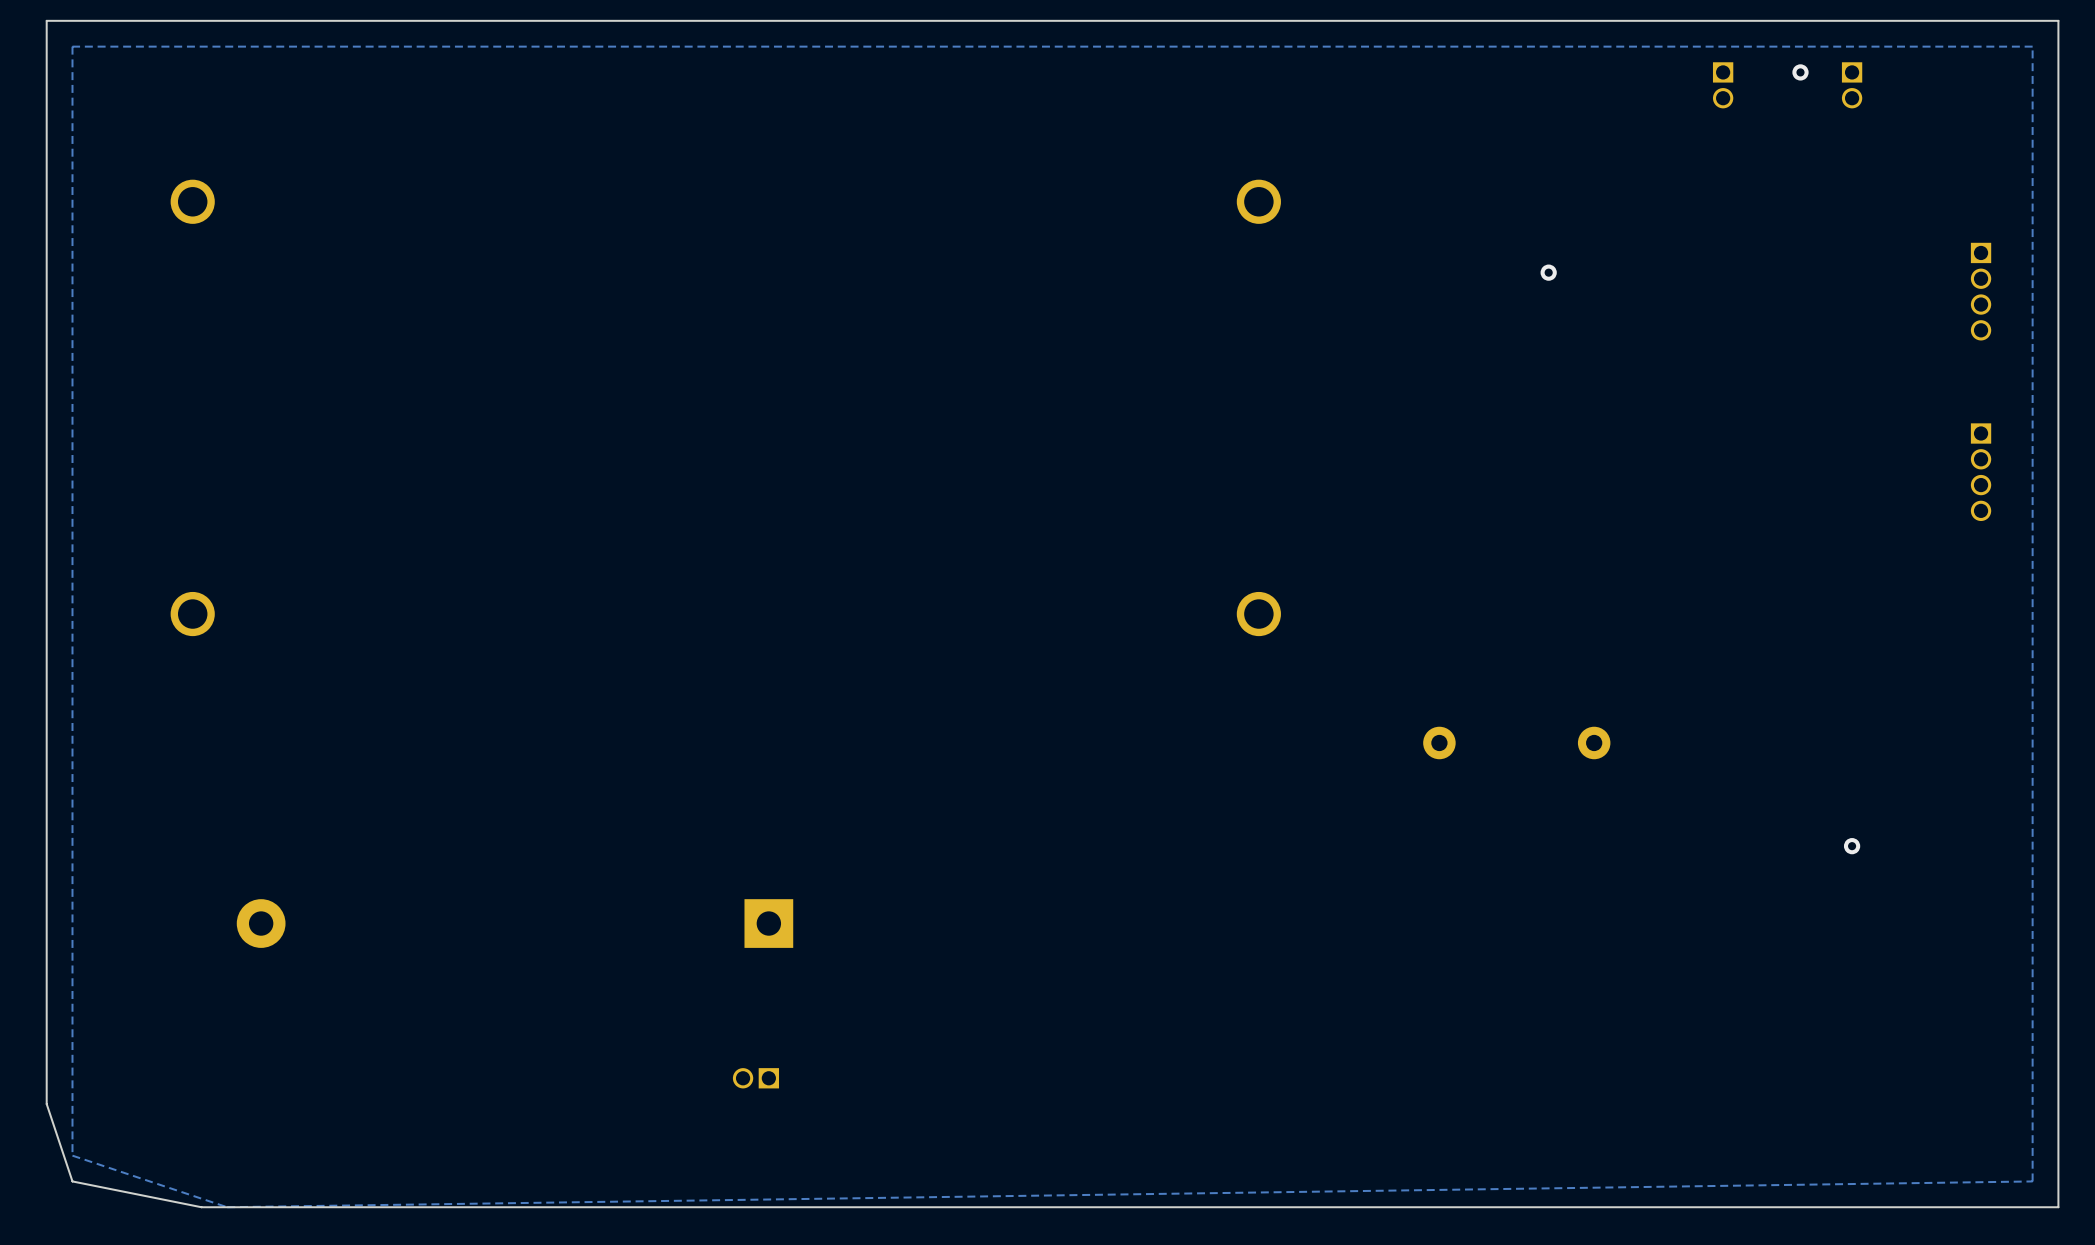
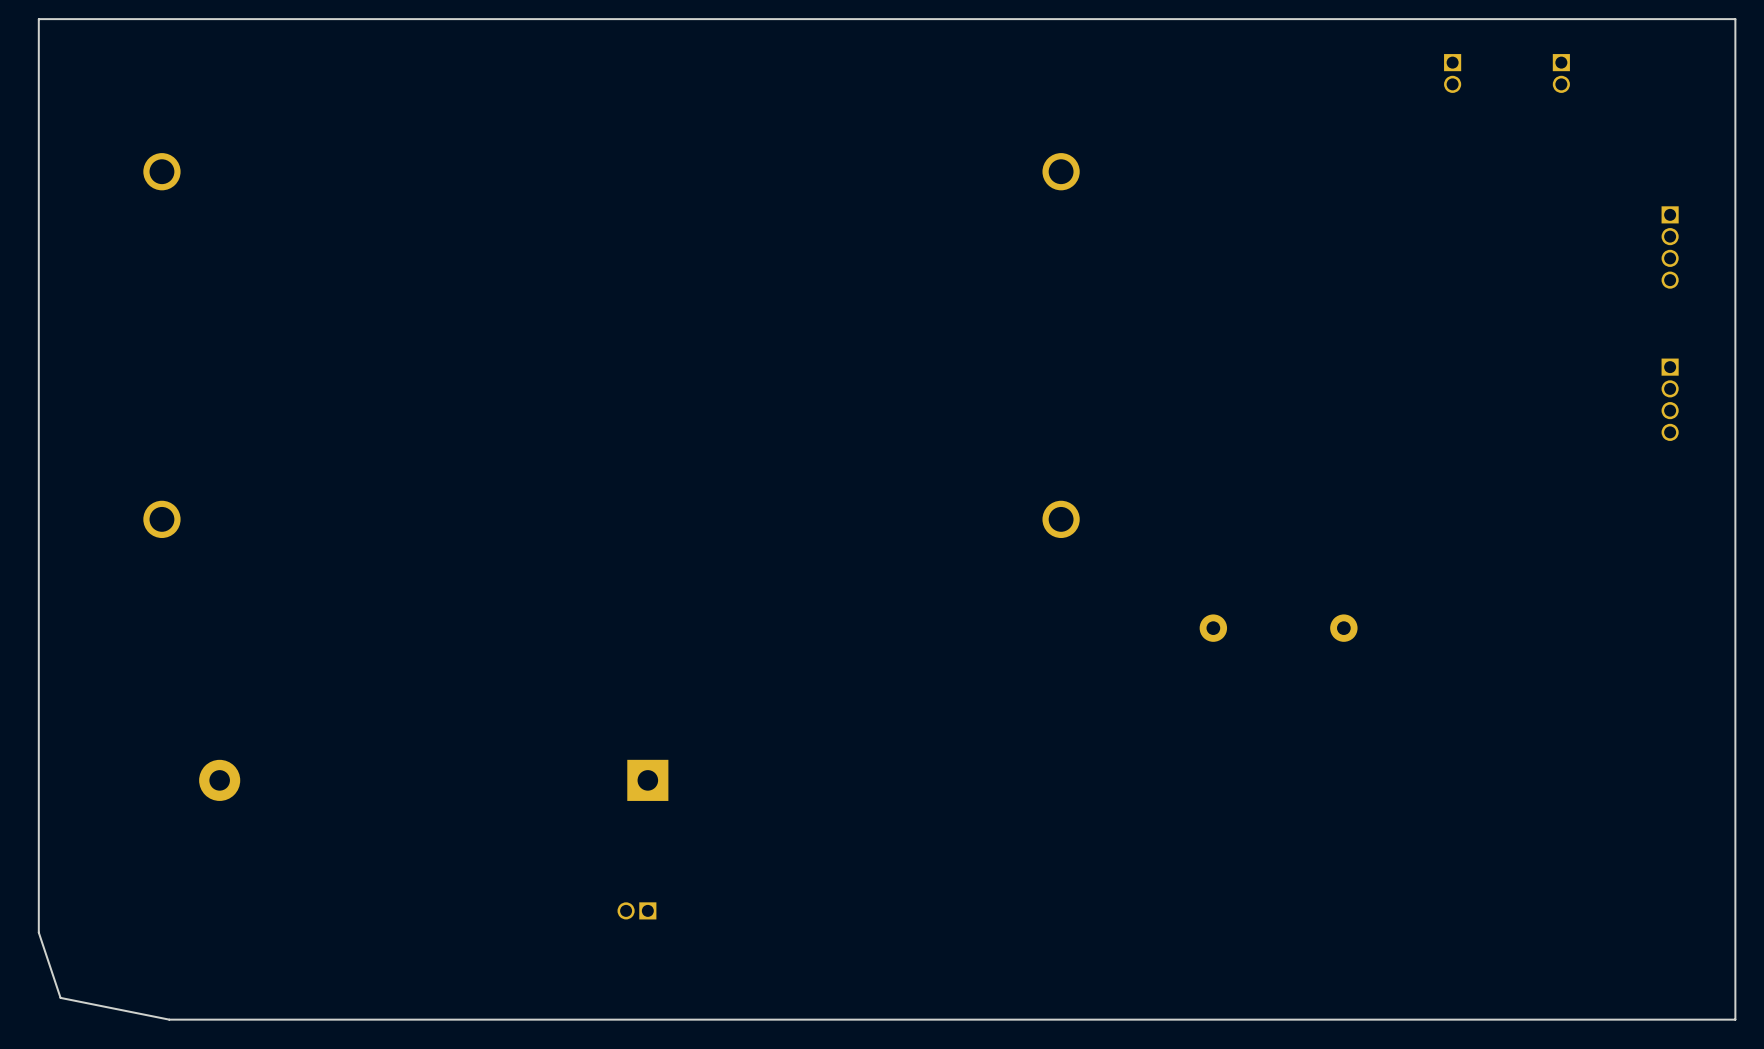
zone outline: (2032, 46) (2032, 1181) (227, 1207) (72, 1155) (72, 46) (2032, 46) -> none
via: (1800, 72) -> none
via: (1548, 272) -> none
via: (1852, 846) -> none

